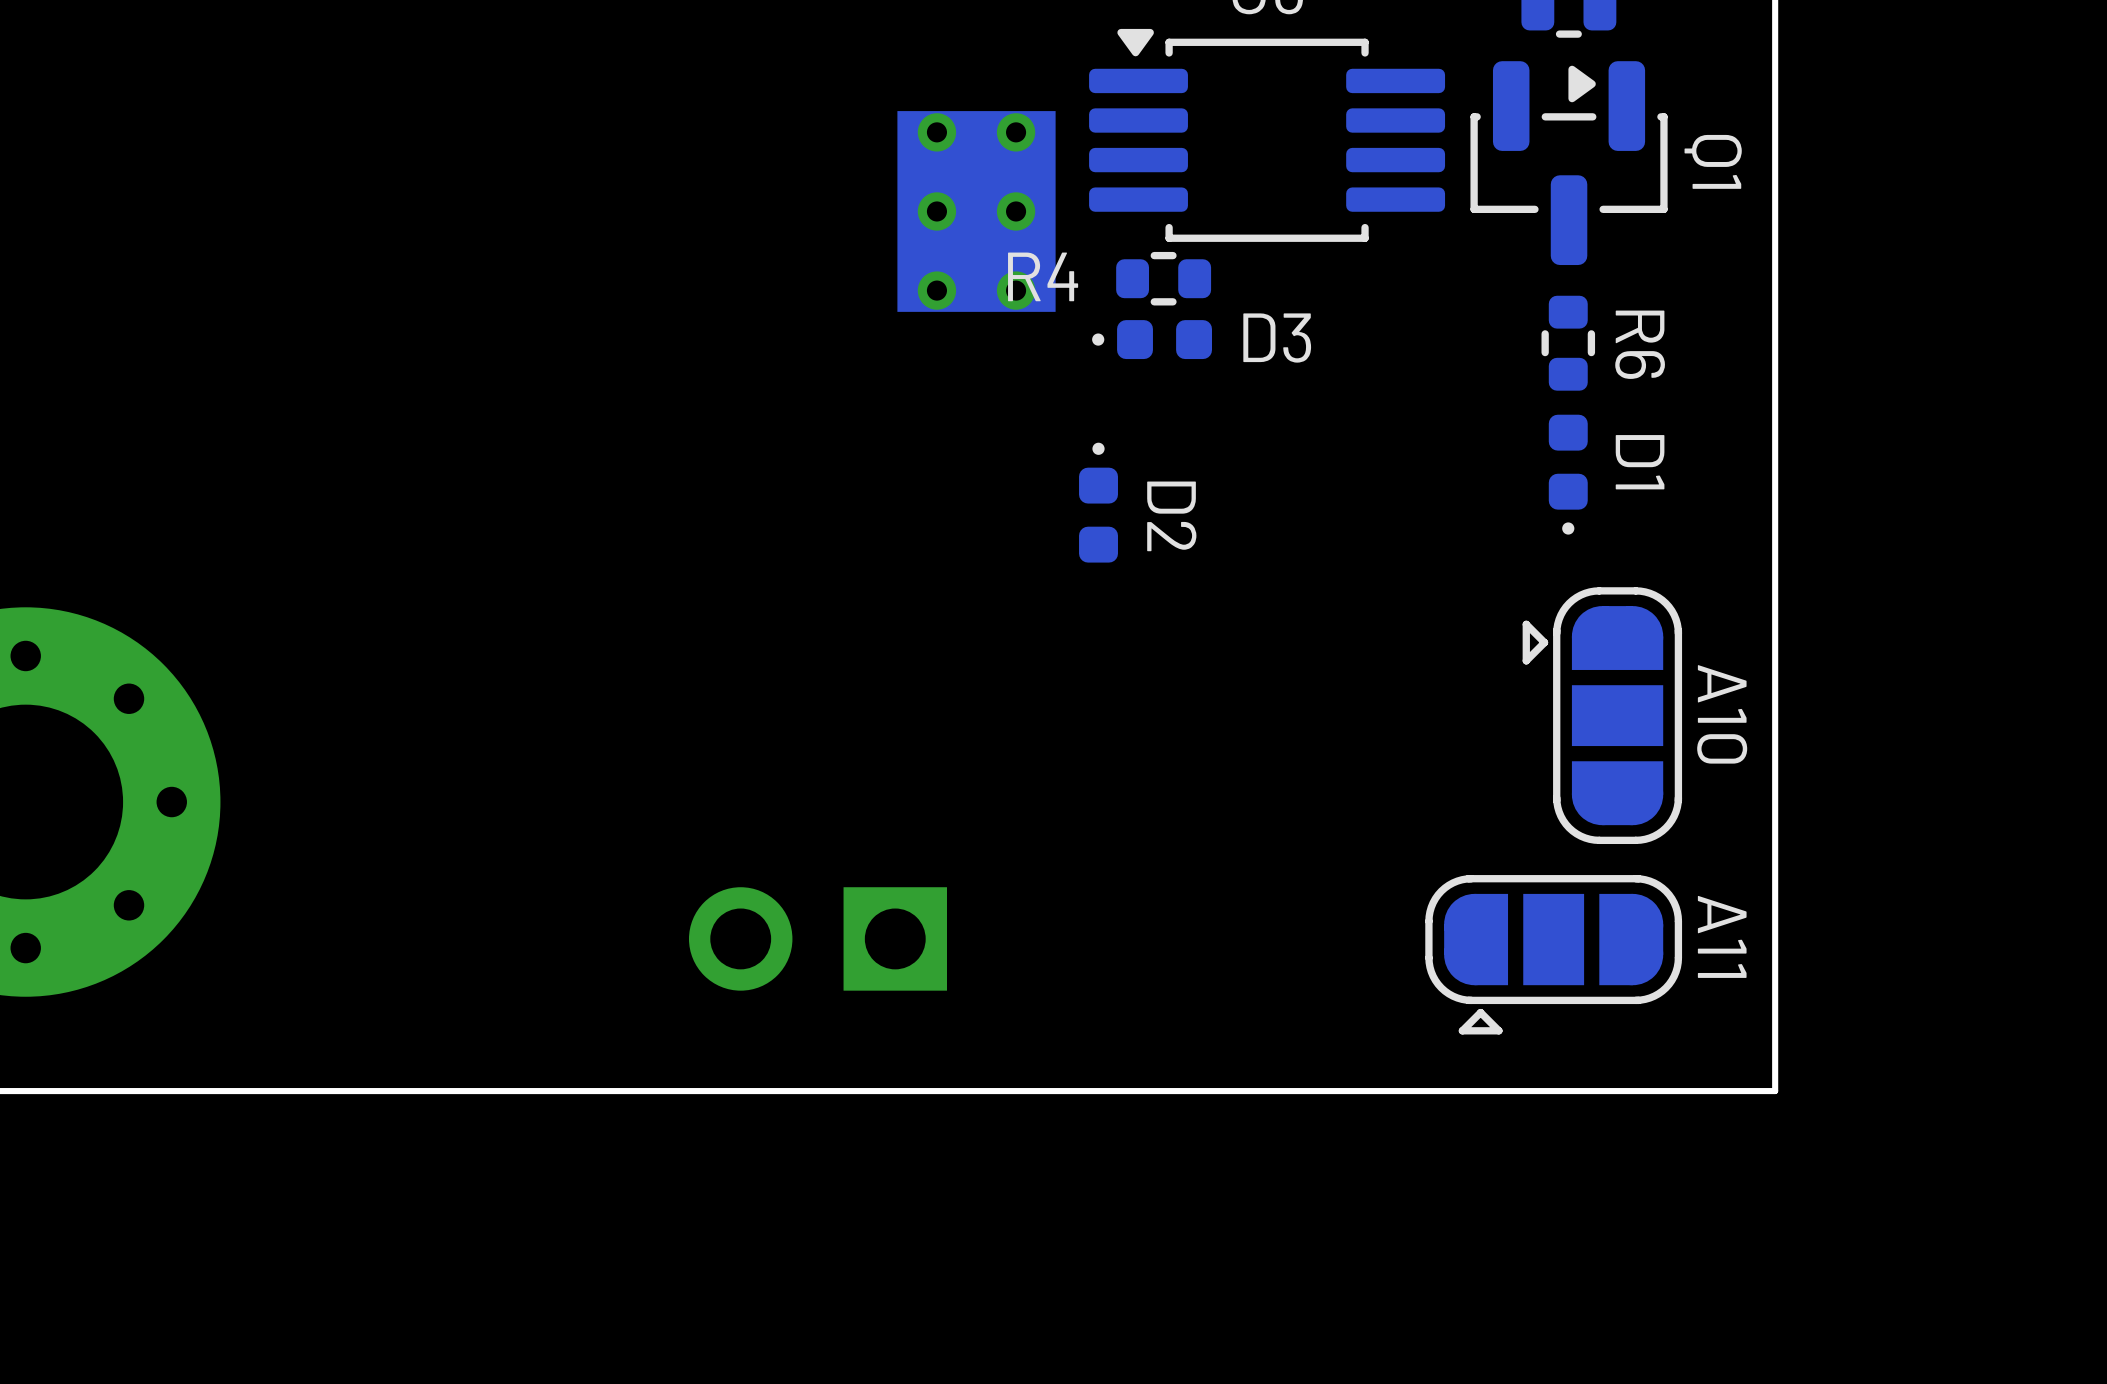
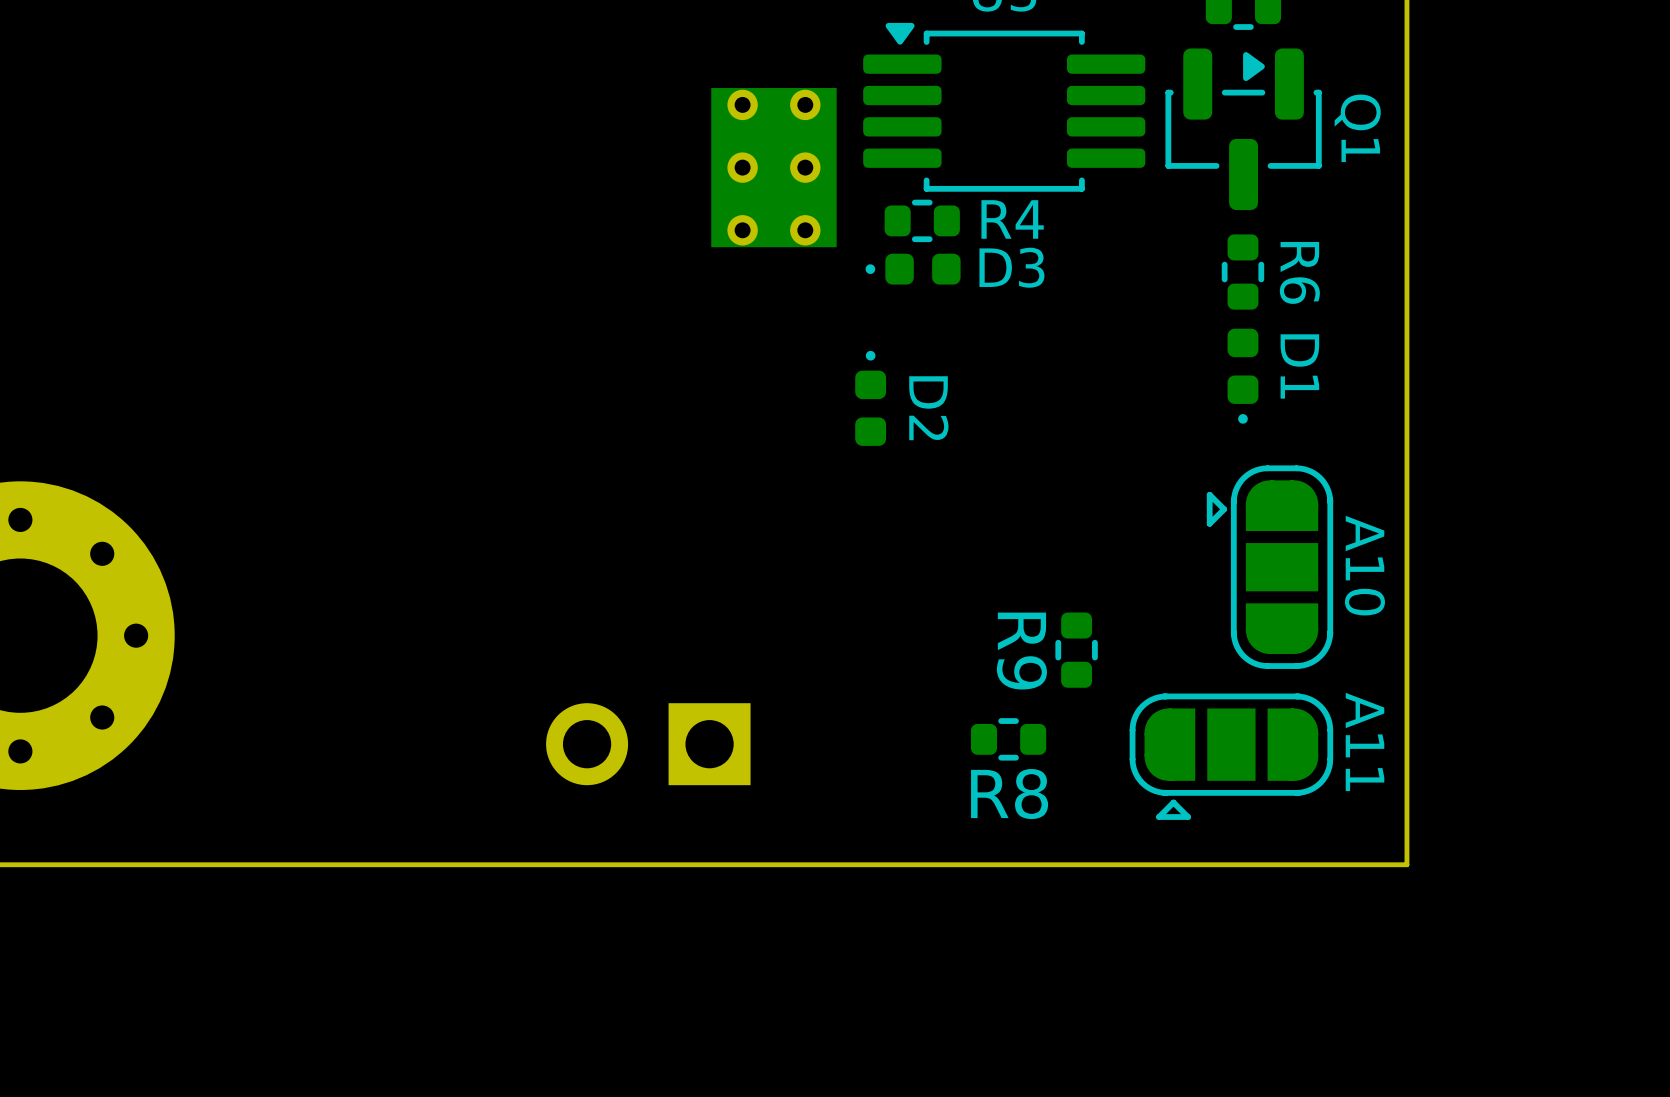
R4 name position: R4 (1043, 276) -> R4 (1012, 219)
R9: none -> (1076, 650)
R8: none -> (1008, 739)

